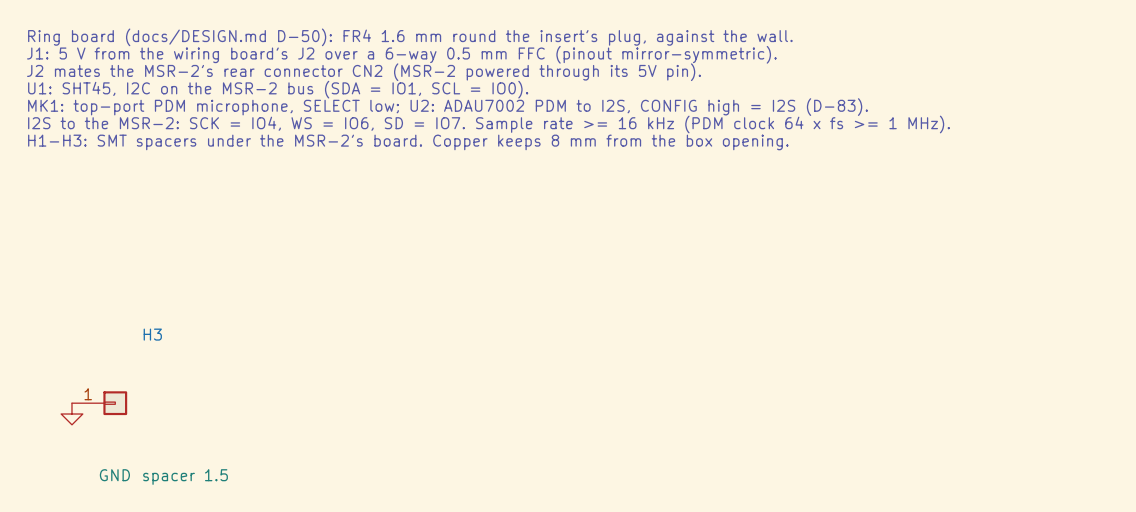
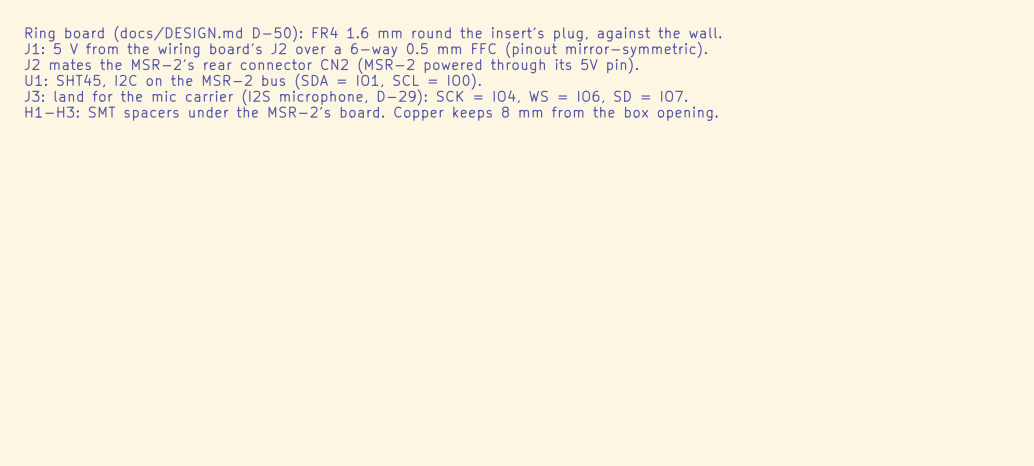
text: MK1: top-port PDM microphone, SELECT low; U2: ADAU7002 PDM to I2S, CONFIG high = I2S (D-83). (448, 107) -> J3: land for the mic carrier (I2S microphone, D-29): SCK = IO4, WS = IO6, SD = IO7. (355, 97)
text: I2S to the MSR-2: SCK = IO4, WS = IO6, SD = IO7. Sample rate >= 16 kHz (PDM clock 64 x fs >= 1 MHz). (488, 124) -> H1-H3: SMT spacers under the MSR-2's board. Copper keeps 8 mm from the box opening. (371, 113)
text: H1-H3: SMT spacers under the MSR-2's board. Copper keeps 8 mm from the box opening. (408, 142) -> none
H3: spacer 1.5 (99, 403) -> none
power symbol: GND (71, 414) -> none

